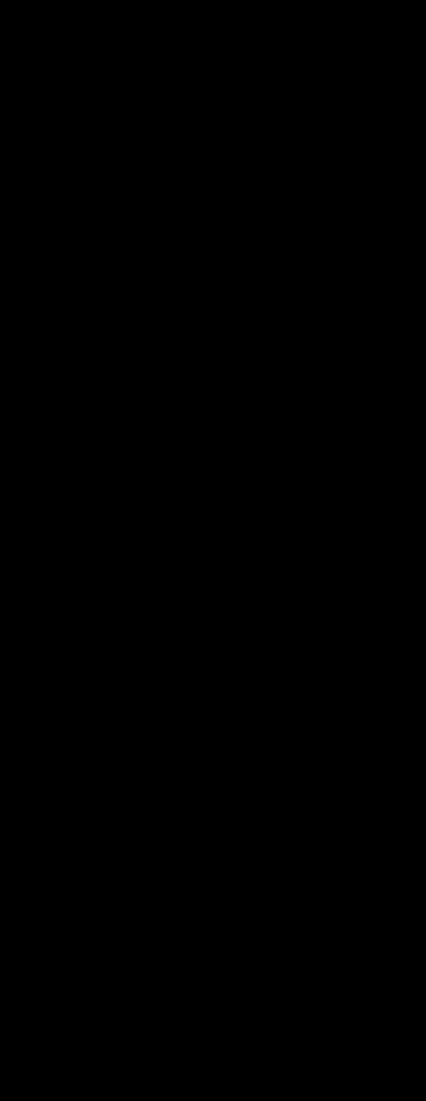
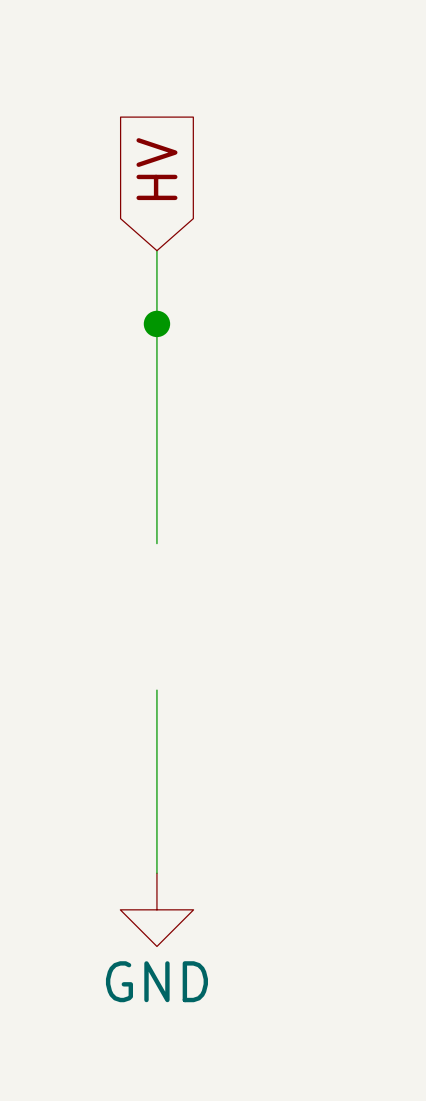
global label: none -> HV (156, 169)
wire: none -> (156, 250) (156, 543)
junction: none -> (156, 323)
wire: none -> (156, 690) (156, 873)
power symbol: none -> GND (156, 909)

